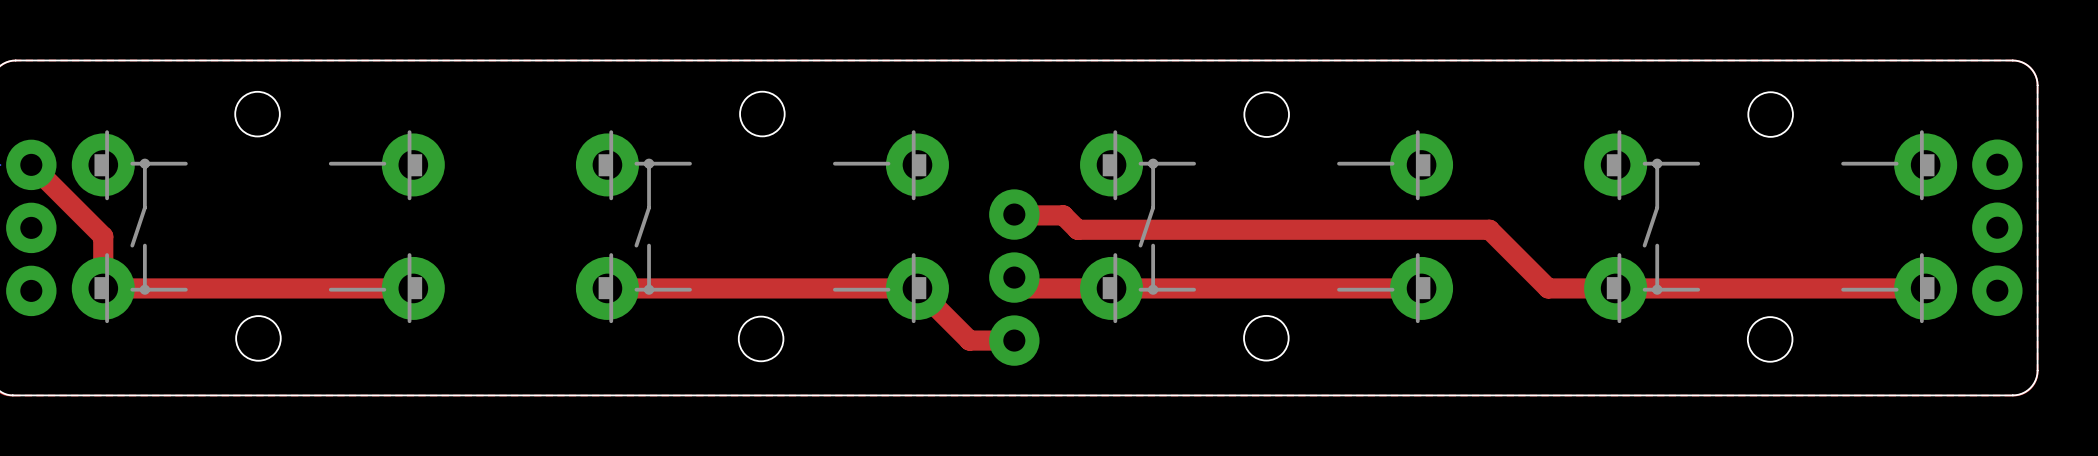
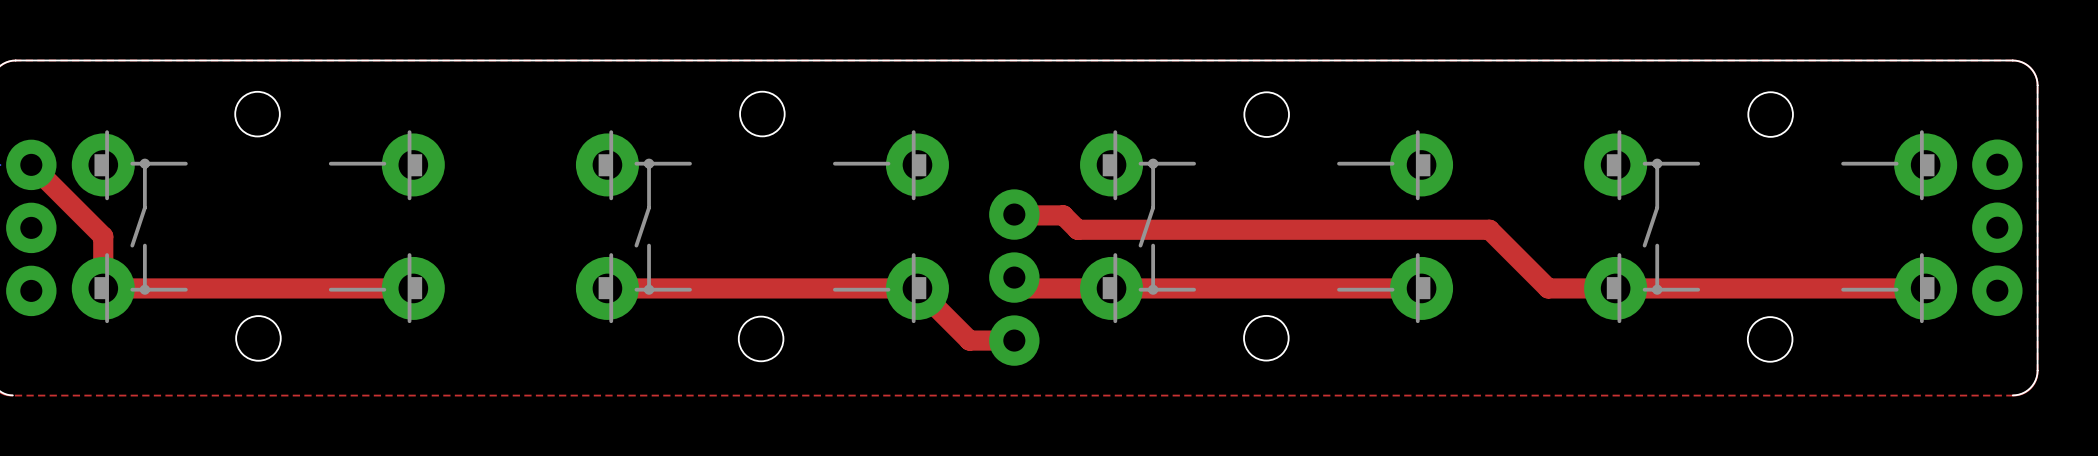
board edge: (2012, 395) (12, 395) -> none

